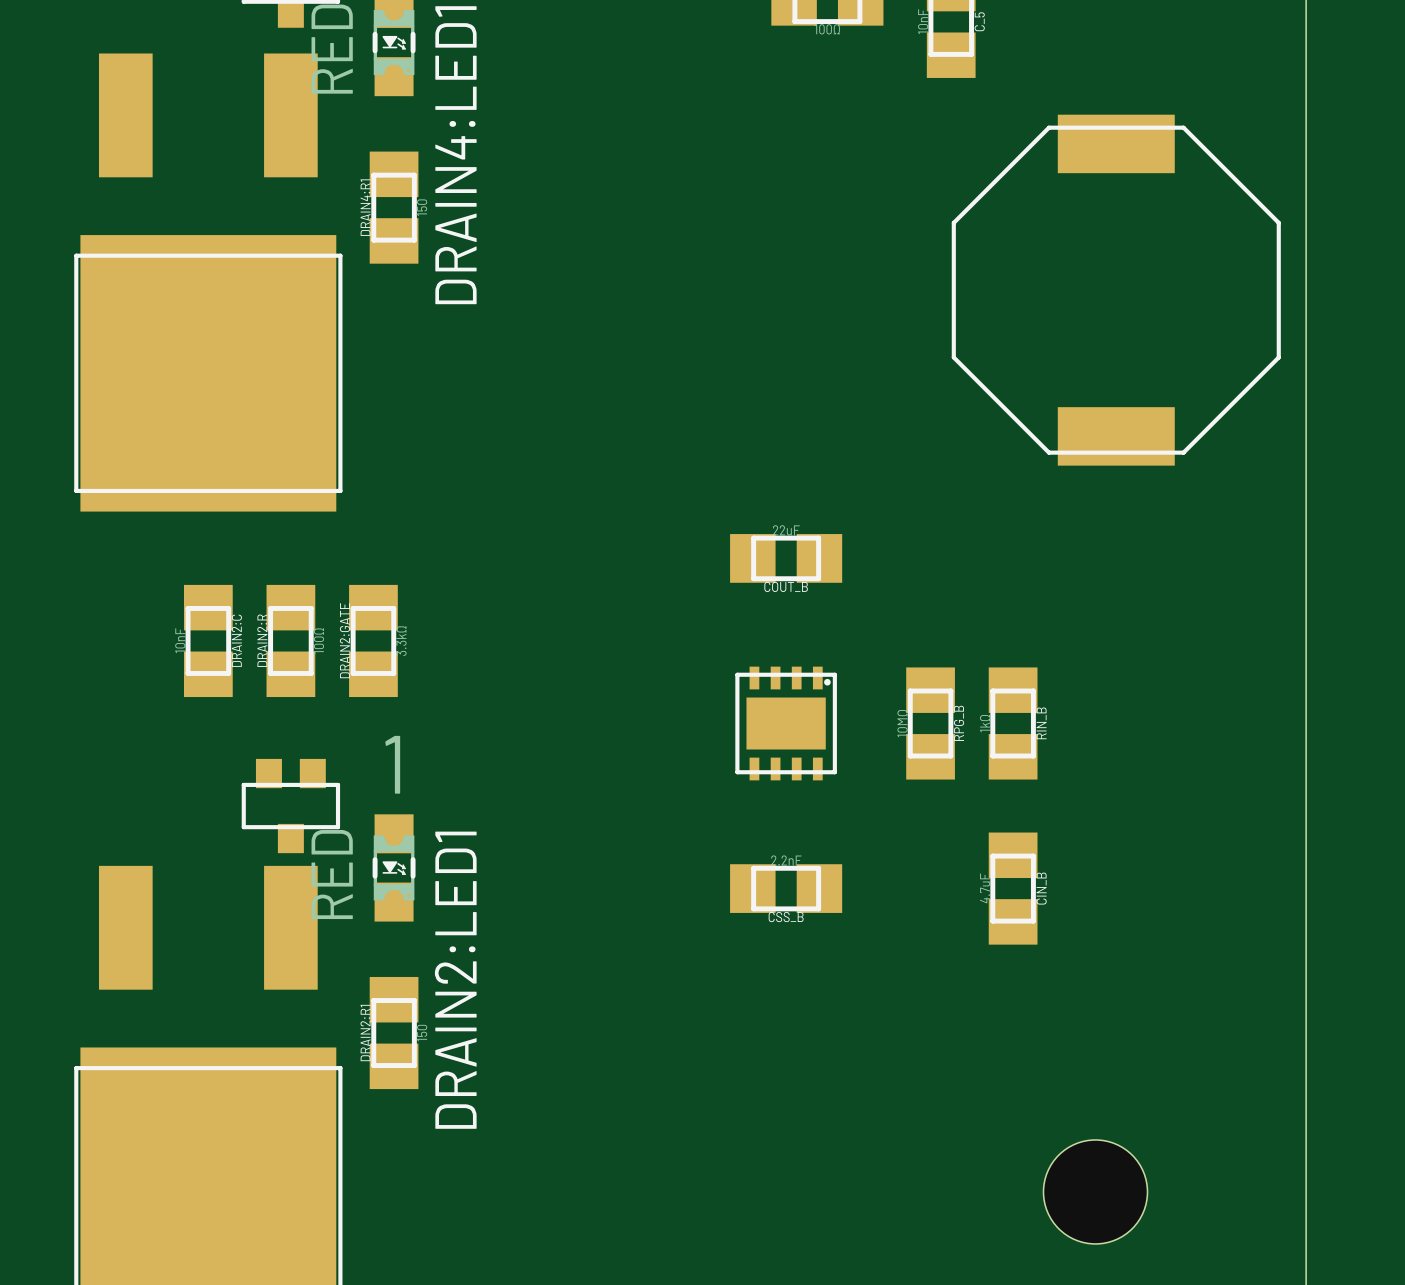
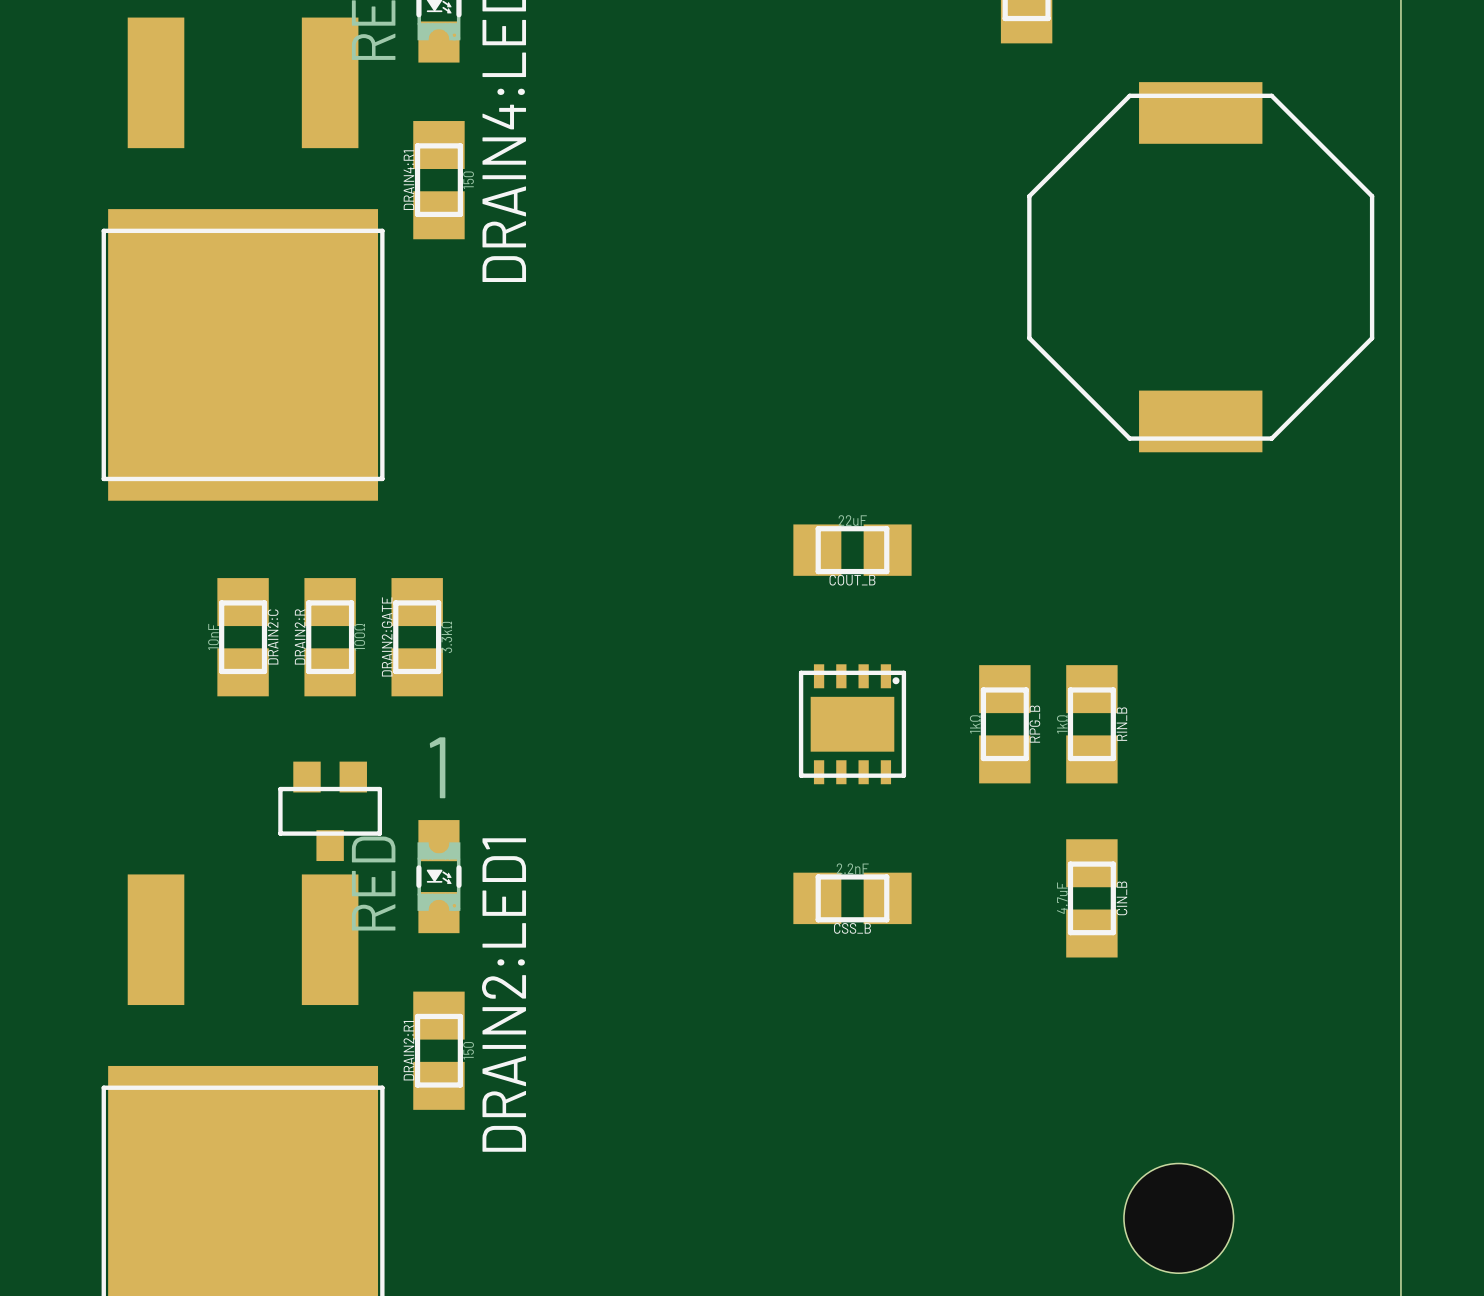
RPG_B value: 10MΩ (902, 723) -> 1kΩ (975, 724)

